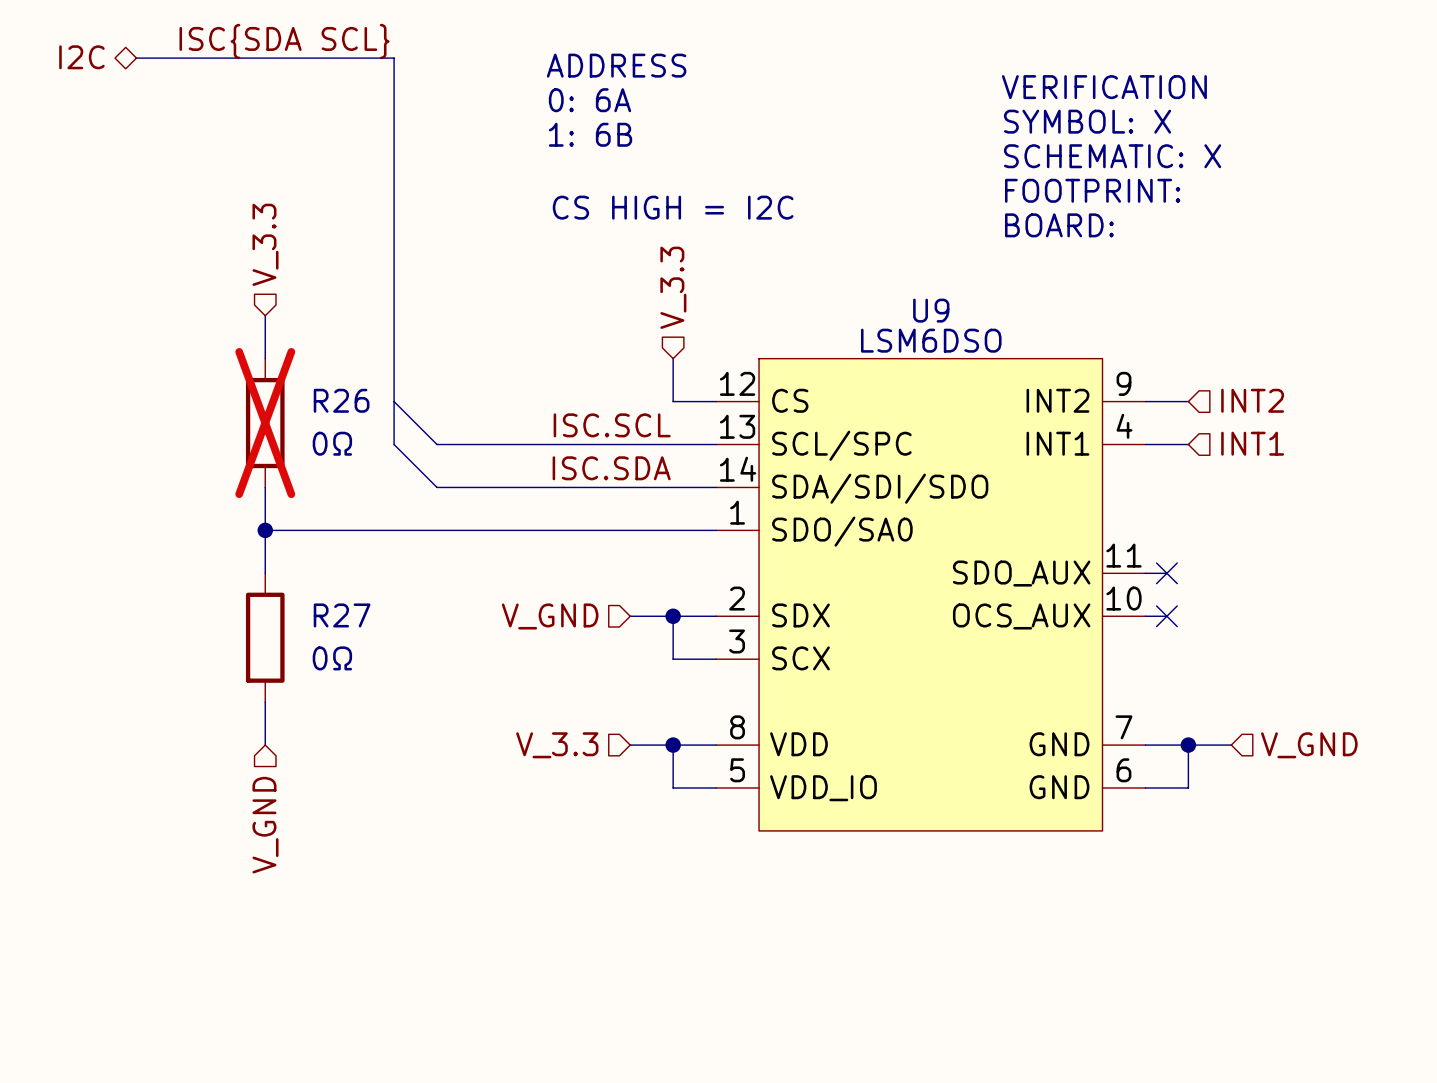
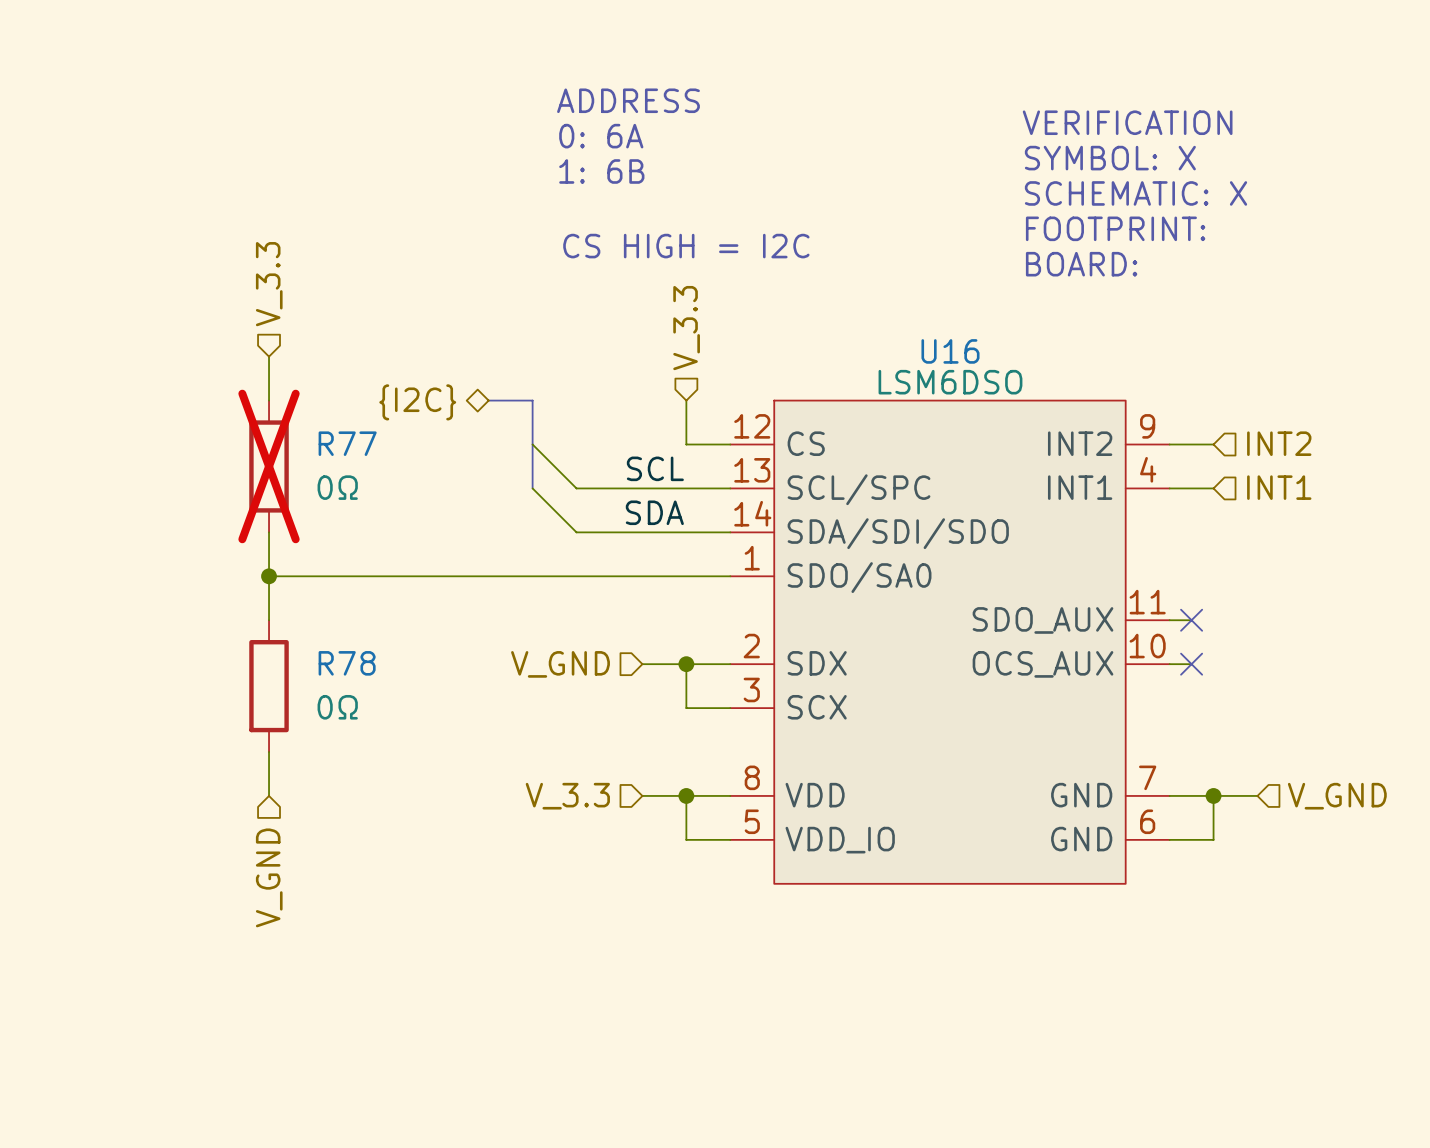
label: ISC{SDA SCL} (284, 41) -> none
hierarchical label: I2C (81, 57) -> none
bus: (136, 58) (394, 58) (394, 444) -> none
U9 name: U9 (931, 310) -> U16 (950, 351)
bus: none -> (488, 400) (532, 400) (532, 488)
hierarchical label: none -> {I2C} (417, 402)
R26 name: R26 (341, 400) -> R77 (347, 443)
wire: (394, 401) (437, 444) (565, 444) -> (532, 444) (576, 488)
label: ISC.SCL (612, 425) -> SCL (655, 468)
wire: (394, 444) (437, 487) (565, 487) -> (532, 488) (576, 532)
label: ISC.SDA (611, 468) -> SDA (654, 512)
R27 name: R27 (342, 615) -> R78 (347, 663)

